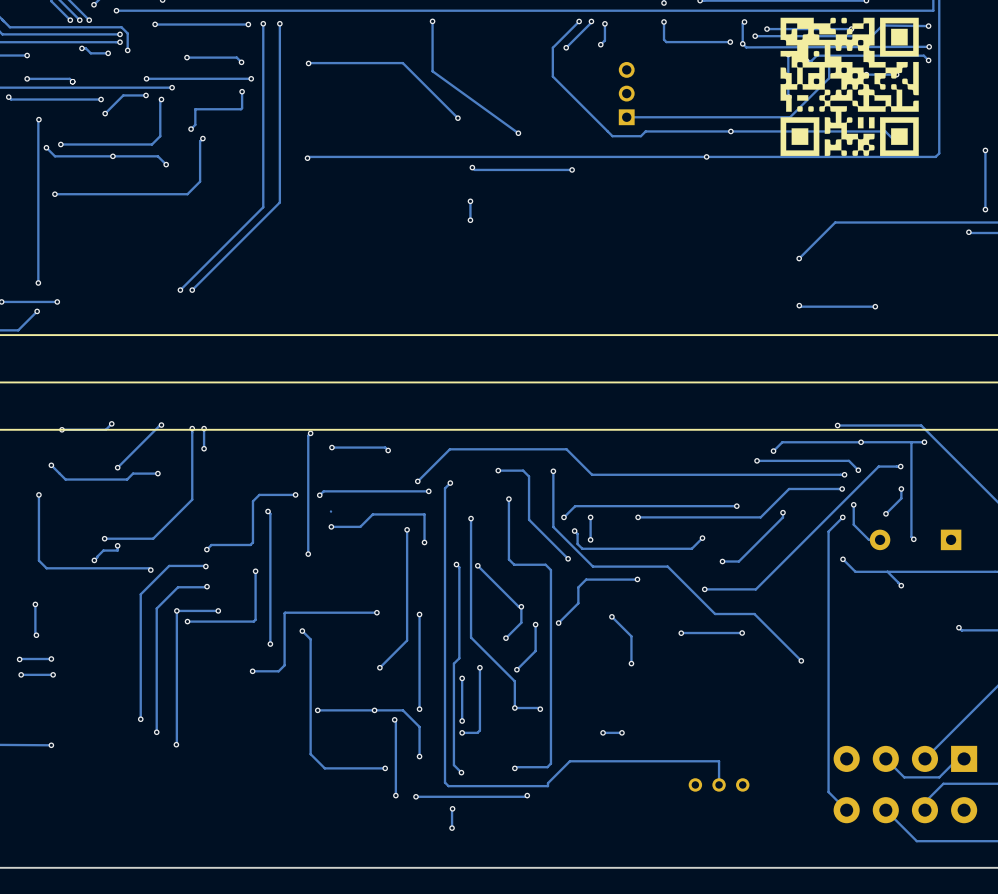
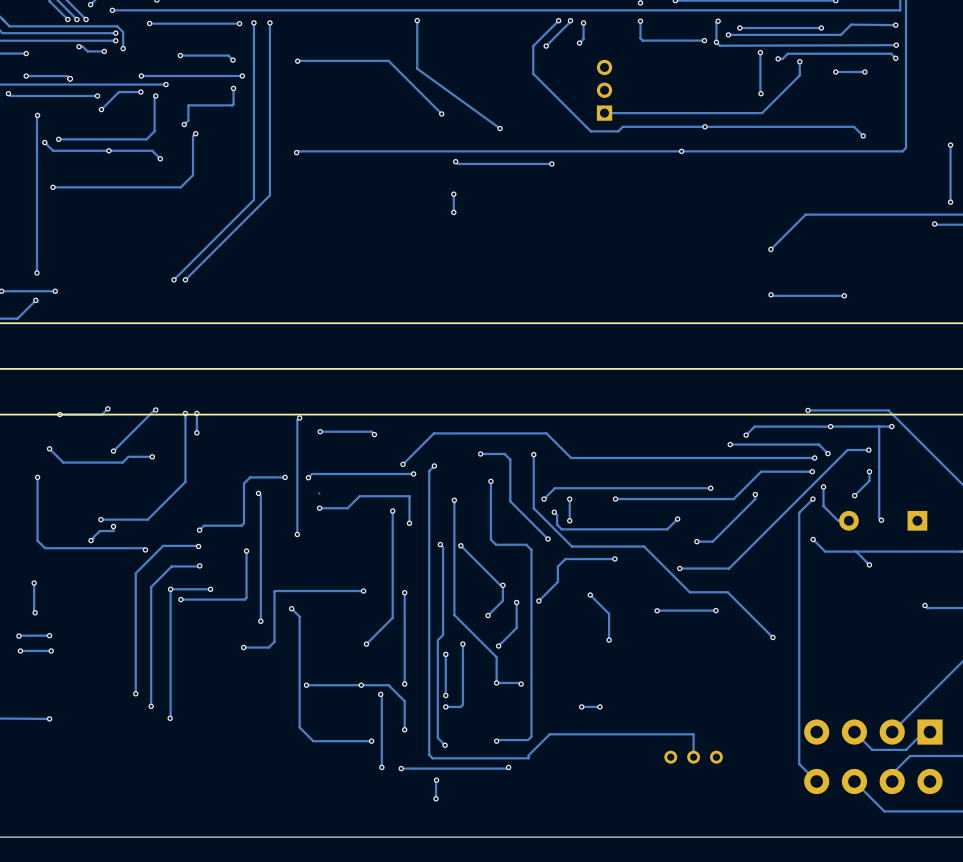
drawing: [780, 17, 919, 156] -> none

